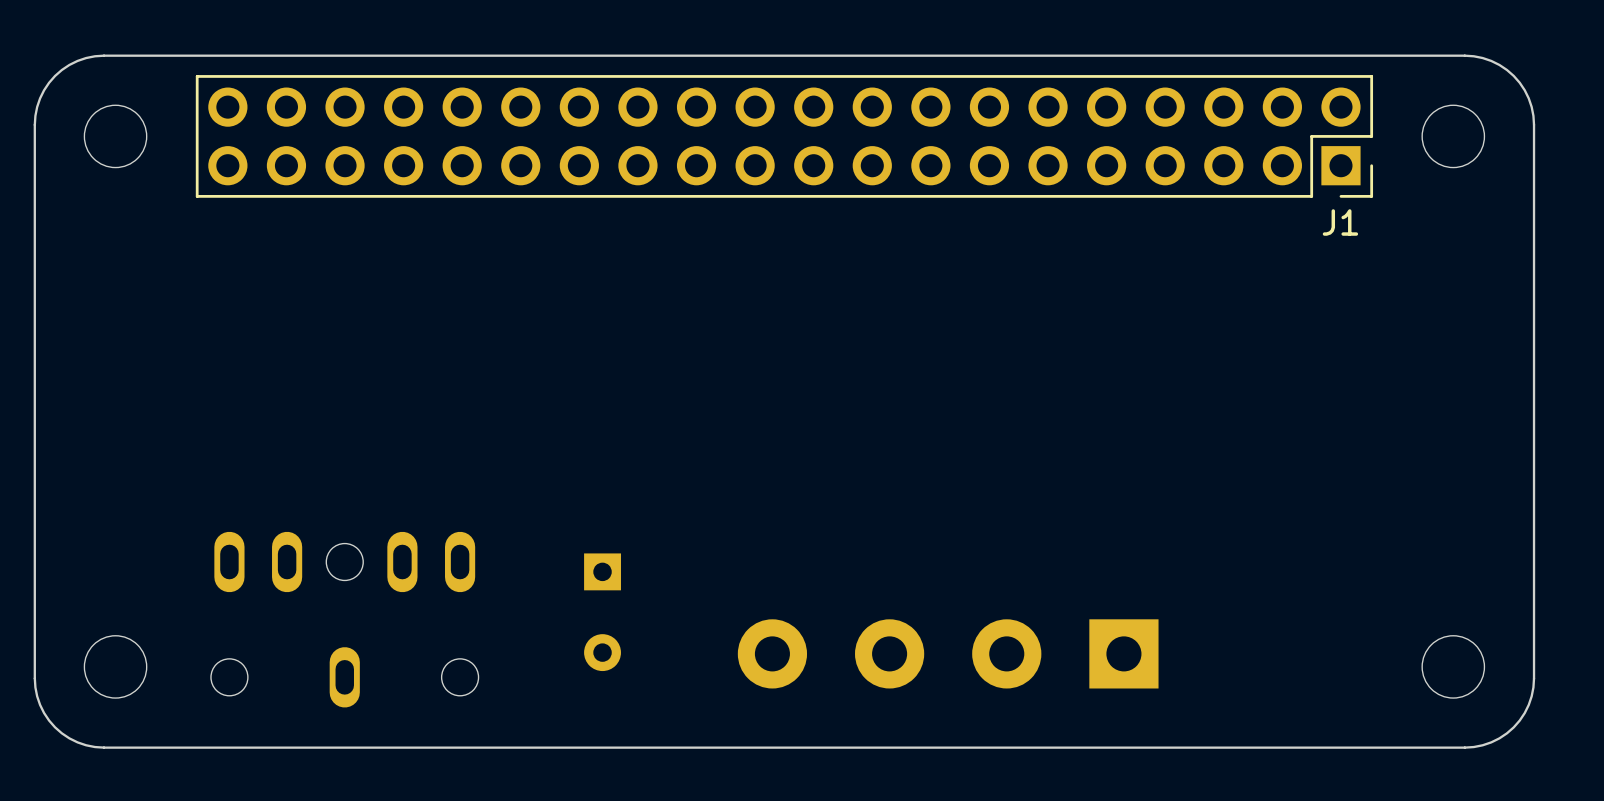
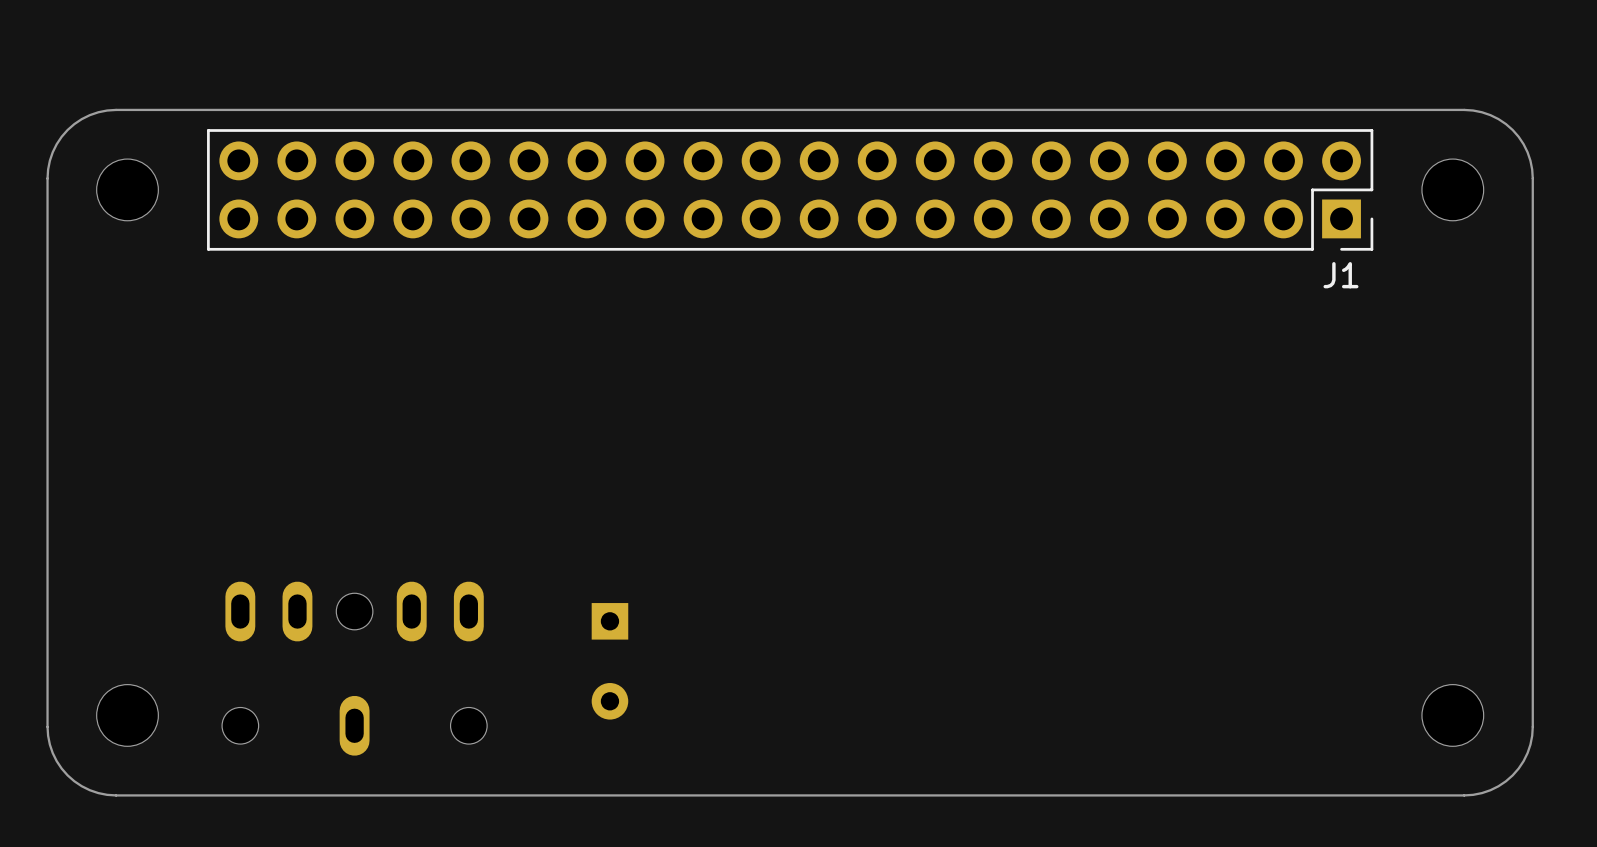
part: (948, 653) -> none

